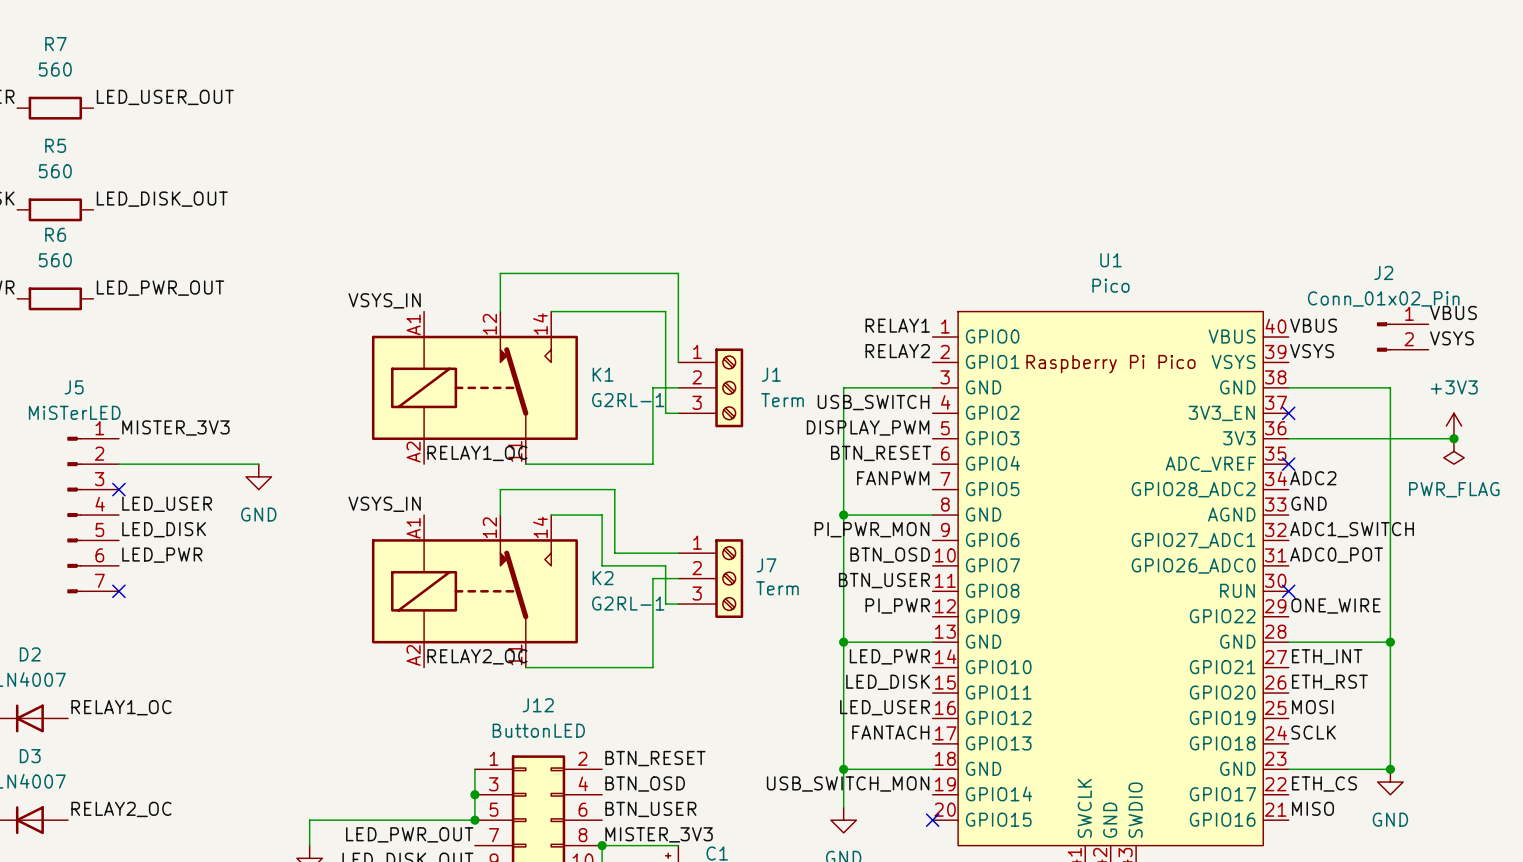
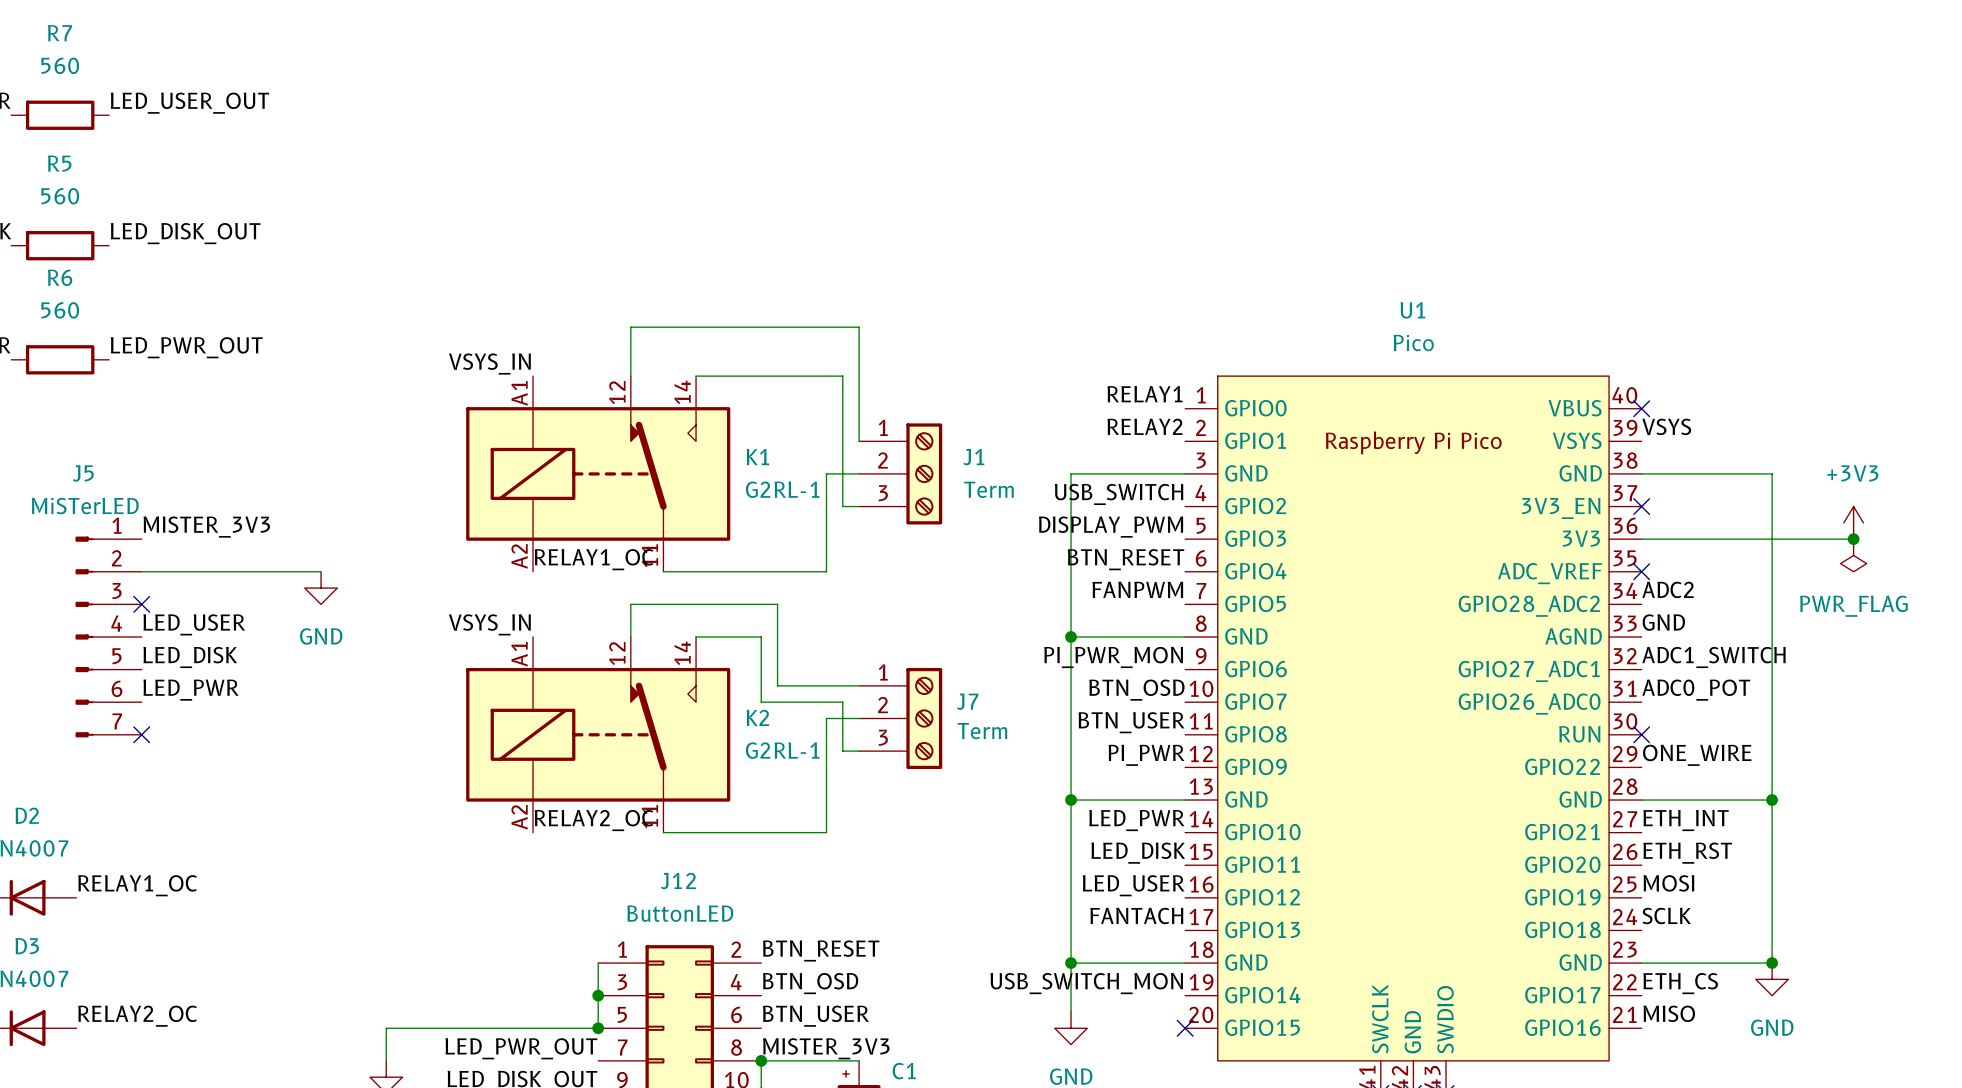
label: VBUS (1453, 312) -> none
label: VBUS (1313, 325) -> none
no-connect mark: none -> (1641, 408)
J2: Conn_01x02_Pin (1402, 337) -> none
label: VSYS (1451, 338) -> none

